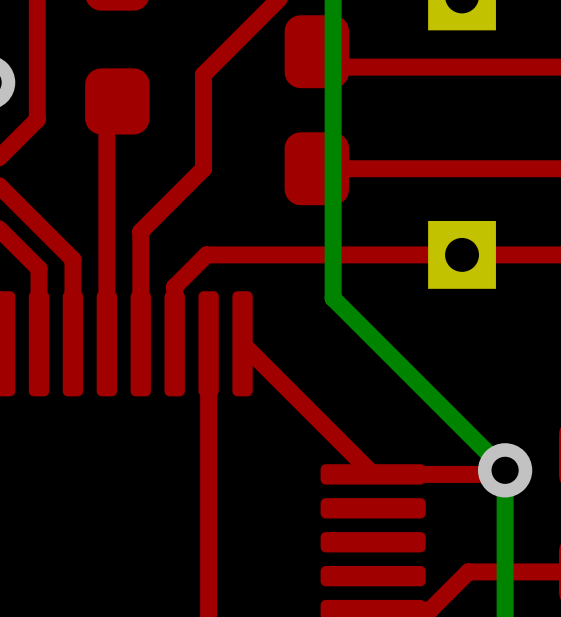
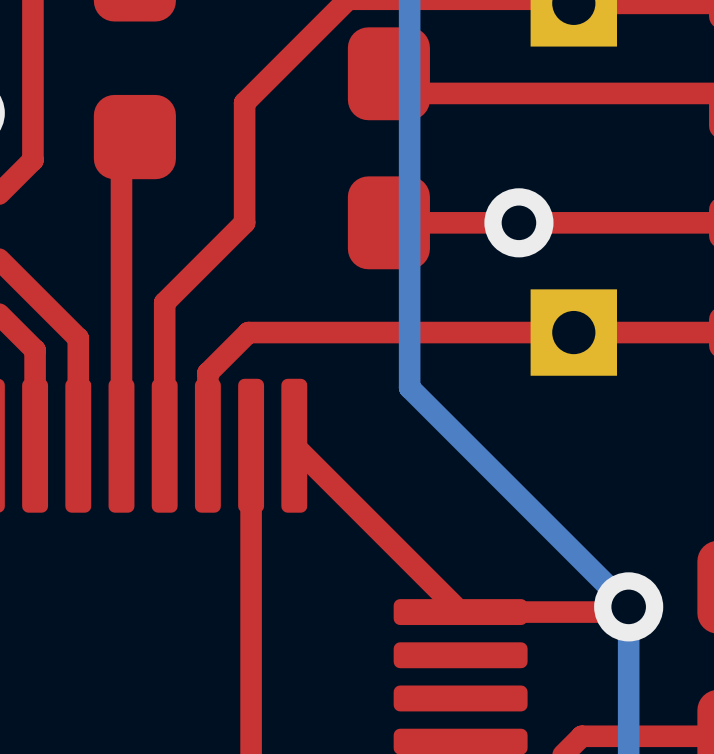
via: none -> (518, 222)

